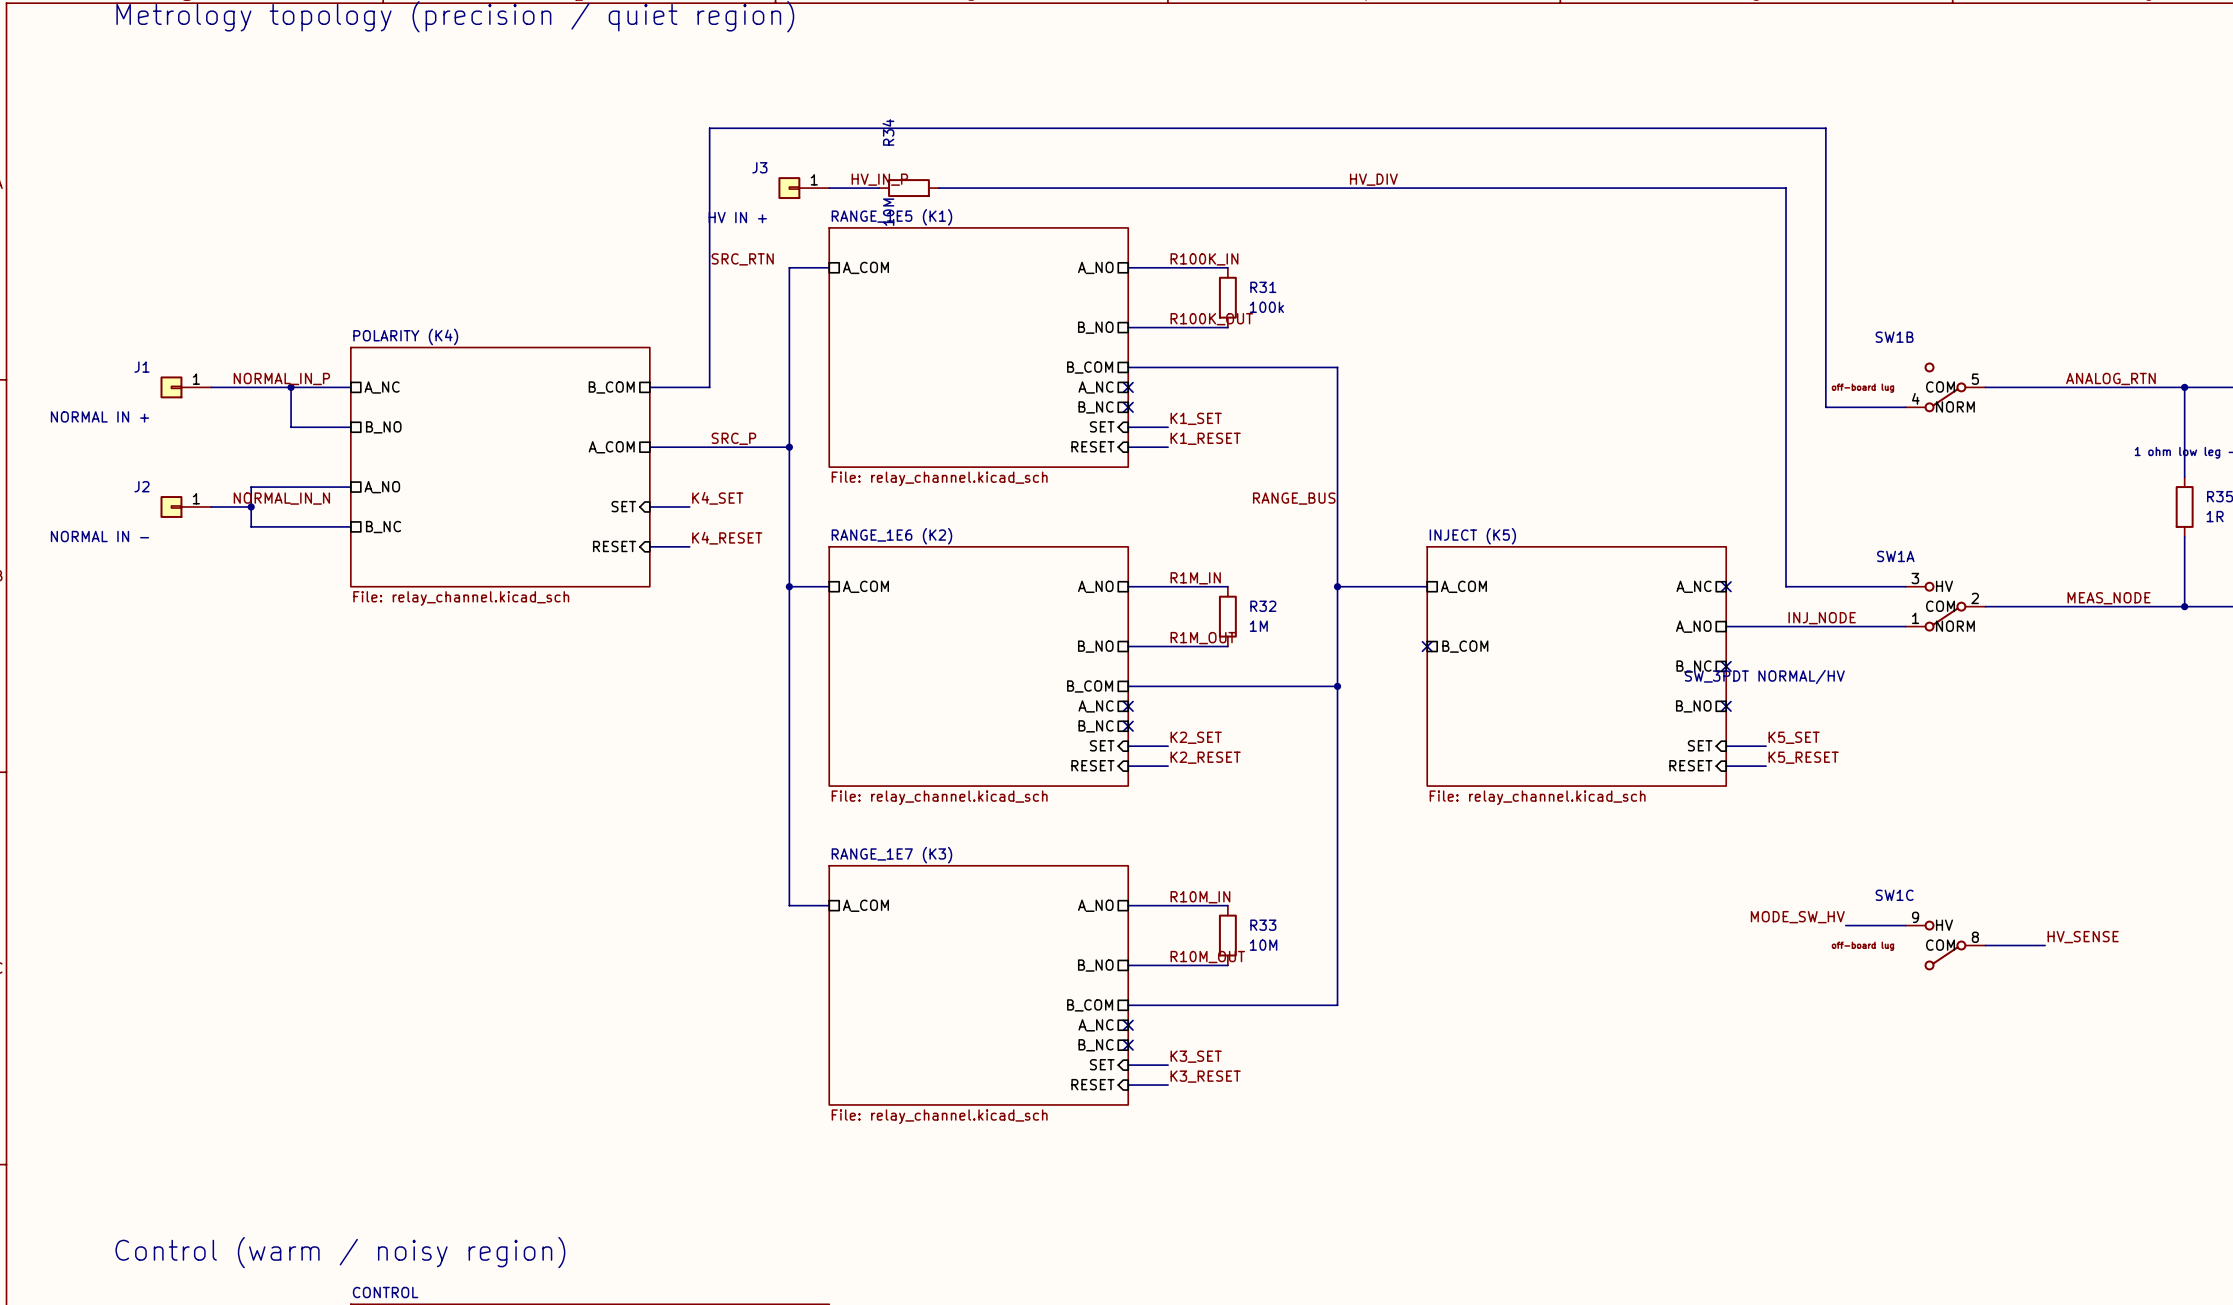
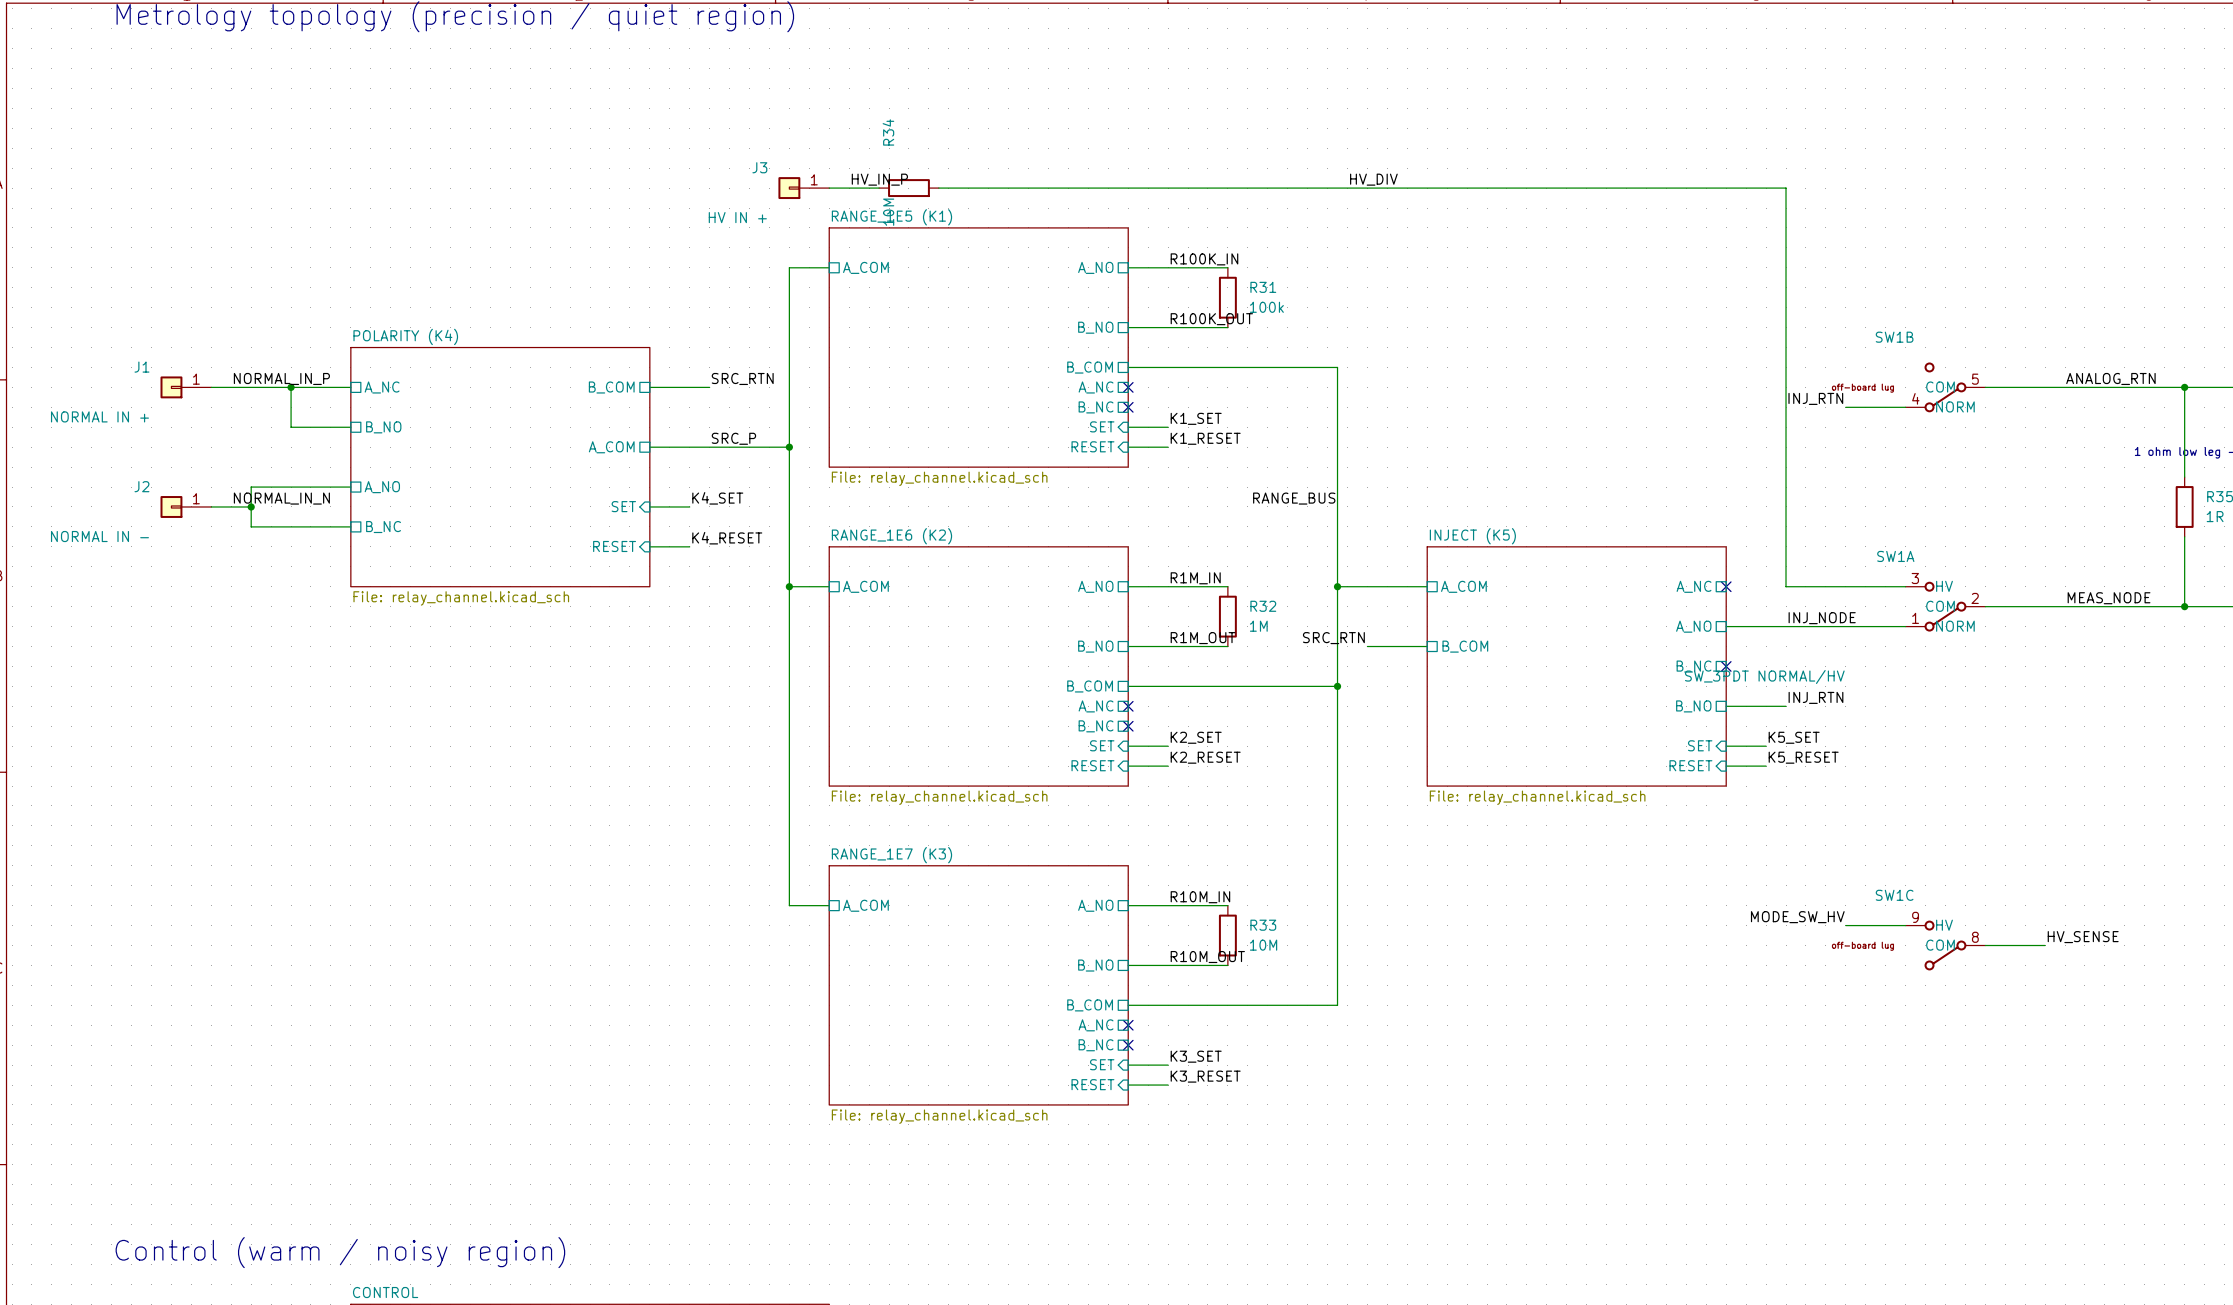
label position: SRC_RTN (742, 259) -> SRC_RTN (742, 378)
wire: (709, 387) (709, 128) (1825, 128) (1825, 407) (1845, 407) -> none
label: none -> INJ_RTN (1815, 398)
label: none -> SRC_RTN (1333, 638)
wire: none -> (1367, 646) (1427, 646)
no-connect mark: (1427, 646) -> none
label: none -> INJ_RTN (1815, 697)
wire: none -> (1726, 706) (1786, 706)
no-connect mark: (1726, 706) -> none

